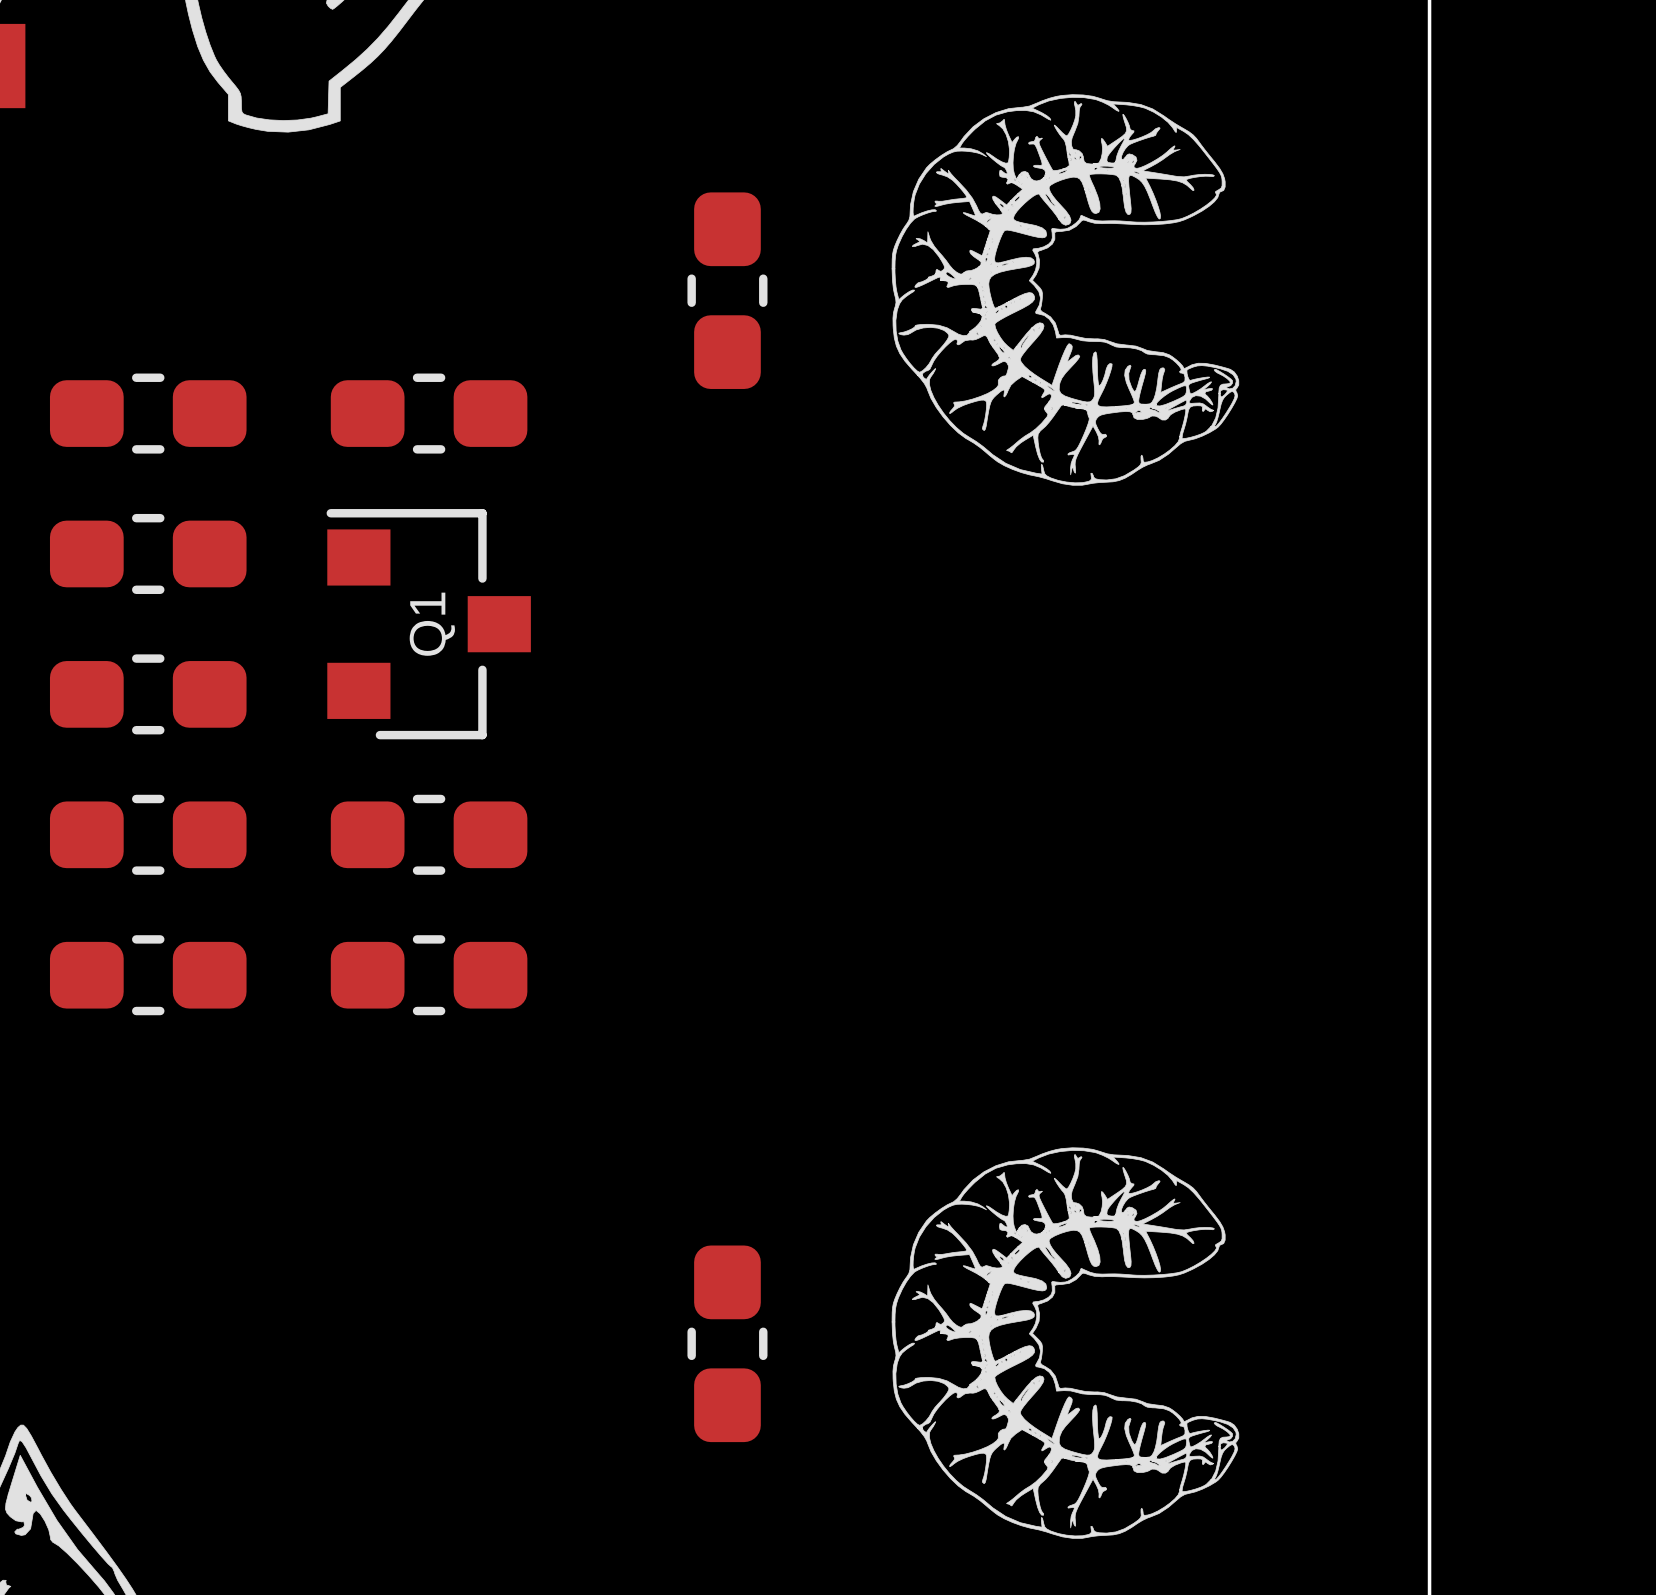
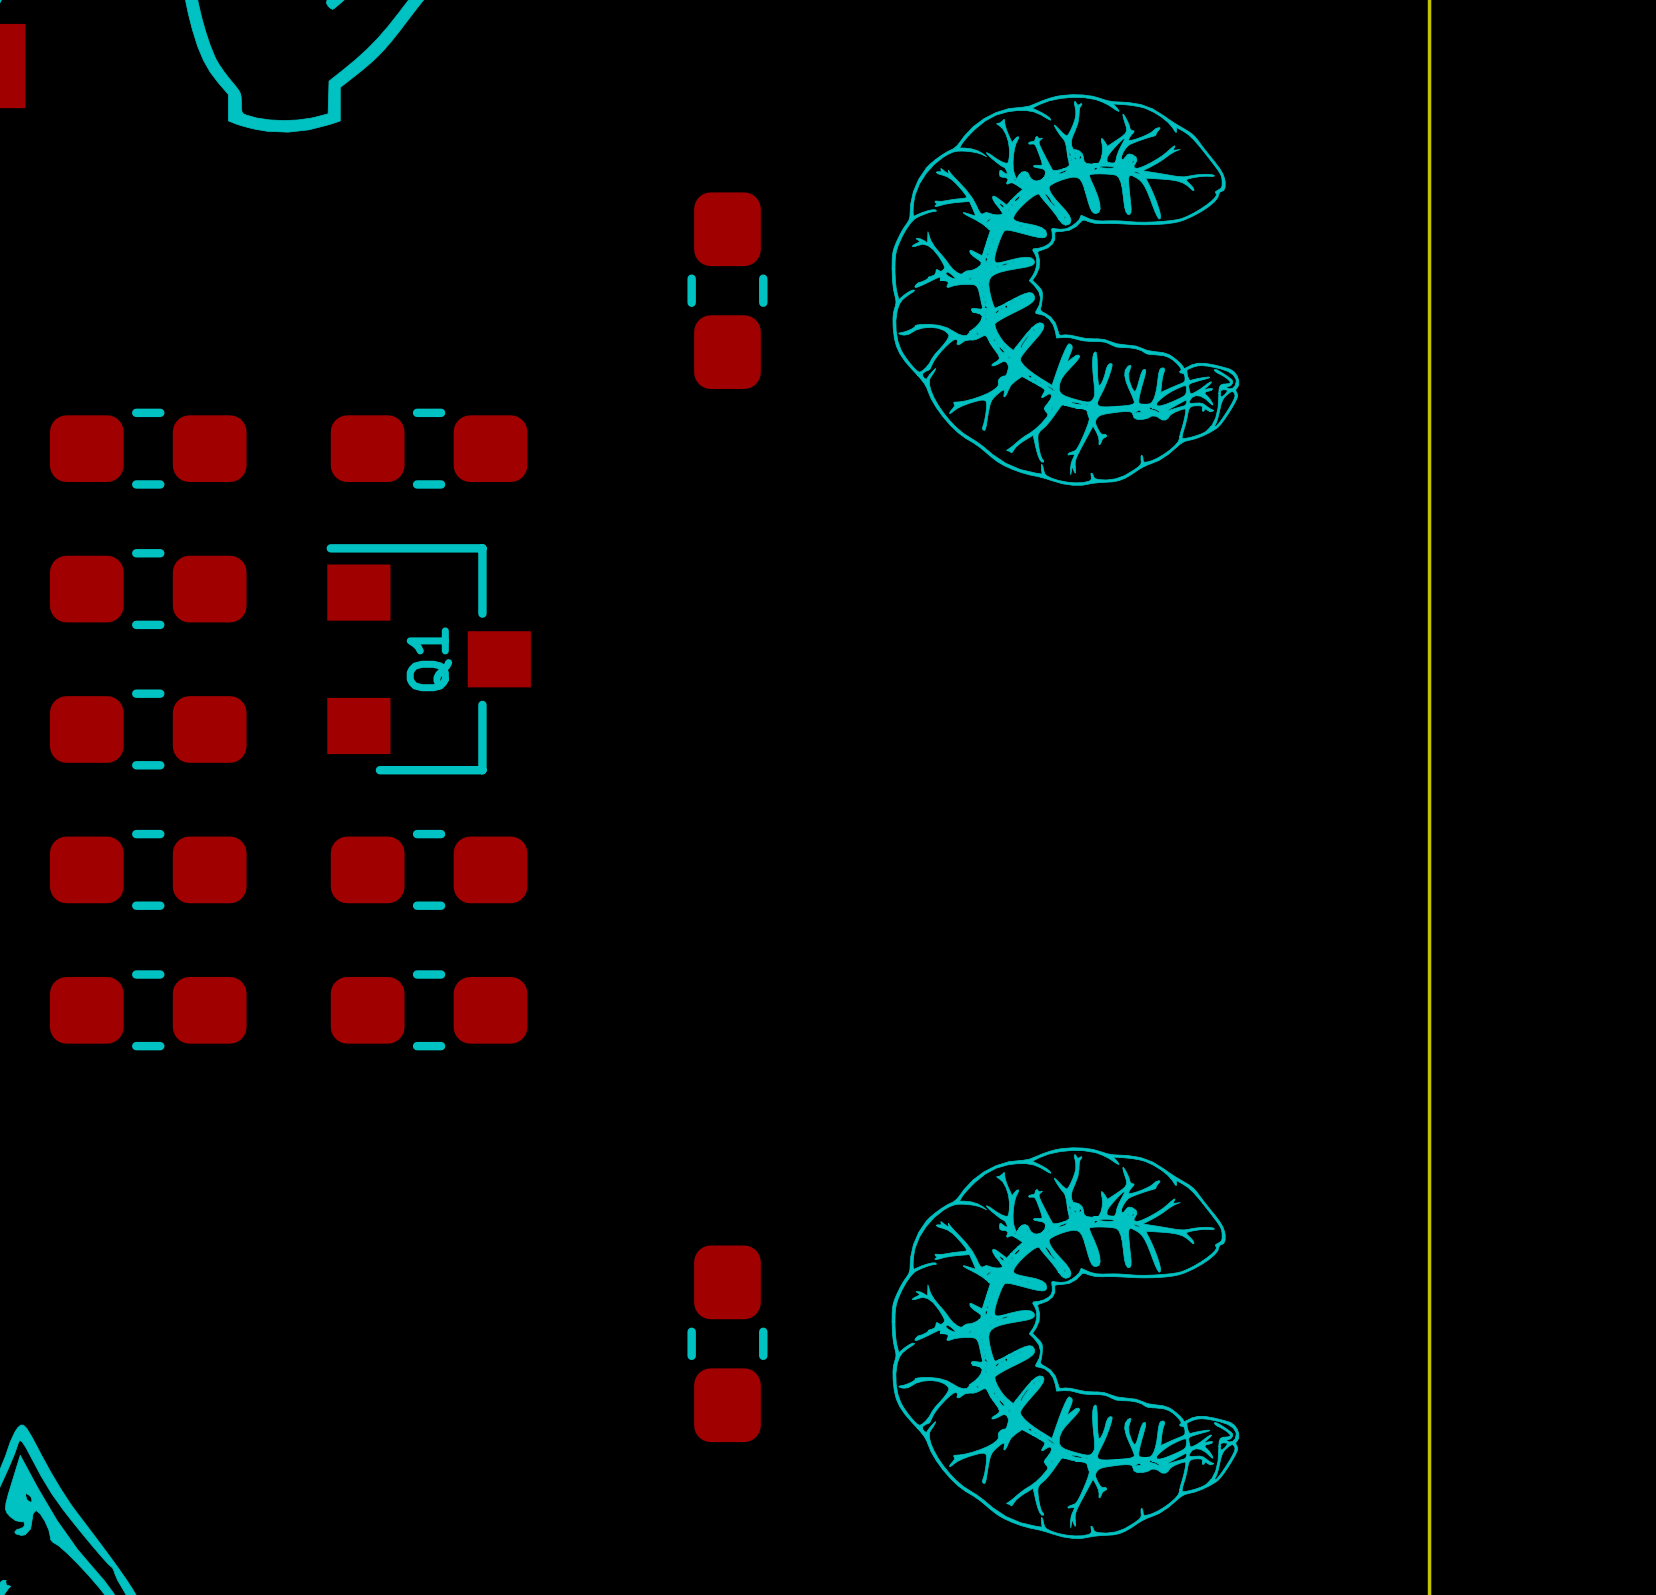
part position: (148, 413) -> (148, 448)
part position: (429, 413) -> (429, 448)
part position: (148, 553) -> (148, 589)
Q1 position: (428, 624) -> (428, 659)
part position: (148, 694) -> (148, 729)
part position: (148, 834) -> (148, 869)
part position: (429, 834) -> (429, 869)
part position: (148, 975) -> (148, 1010)
part position: (429, 975) -> (429, 1010)

